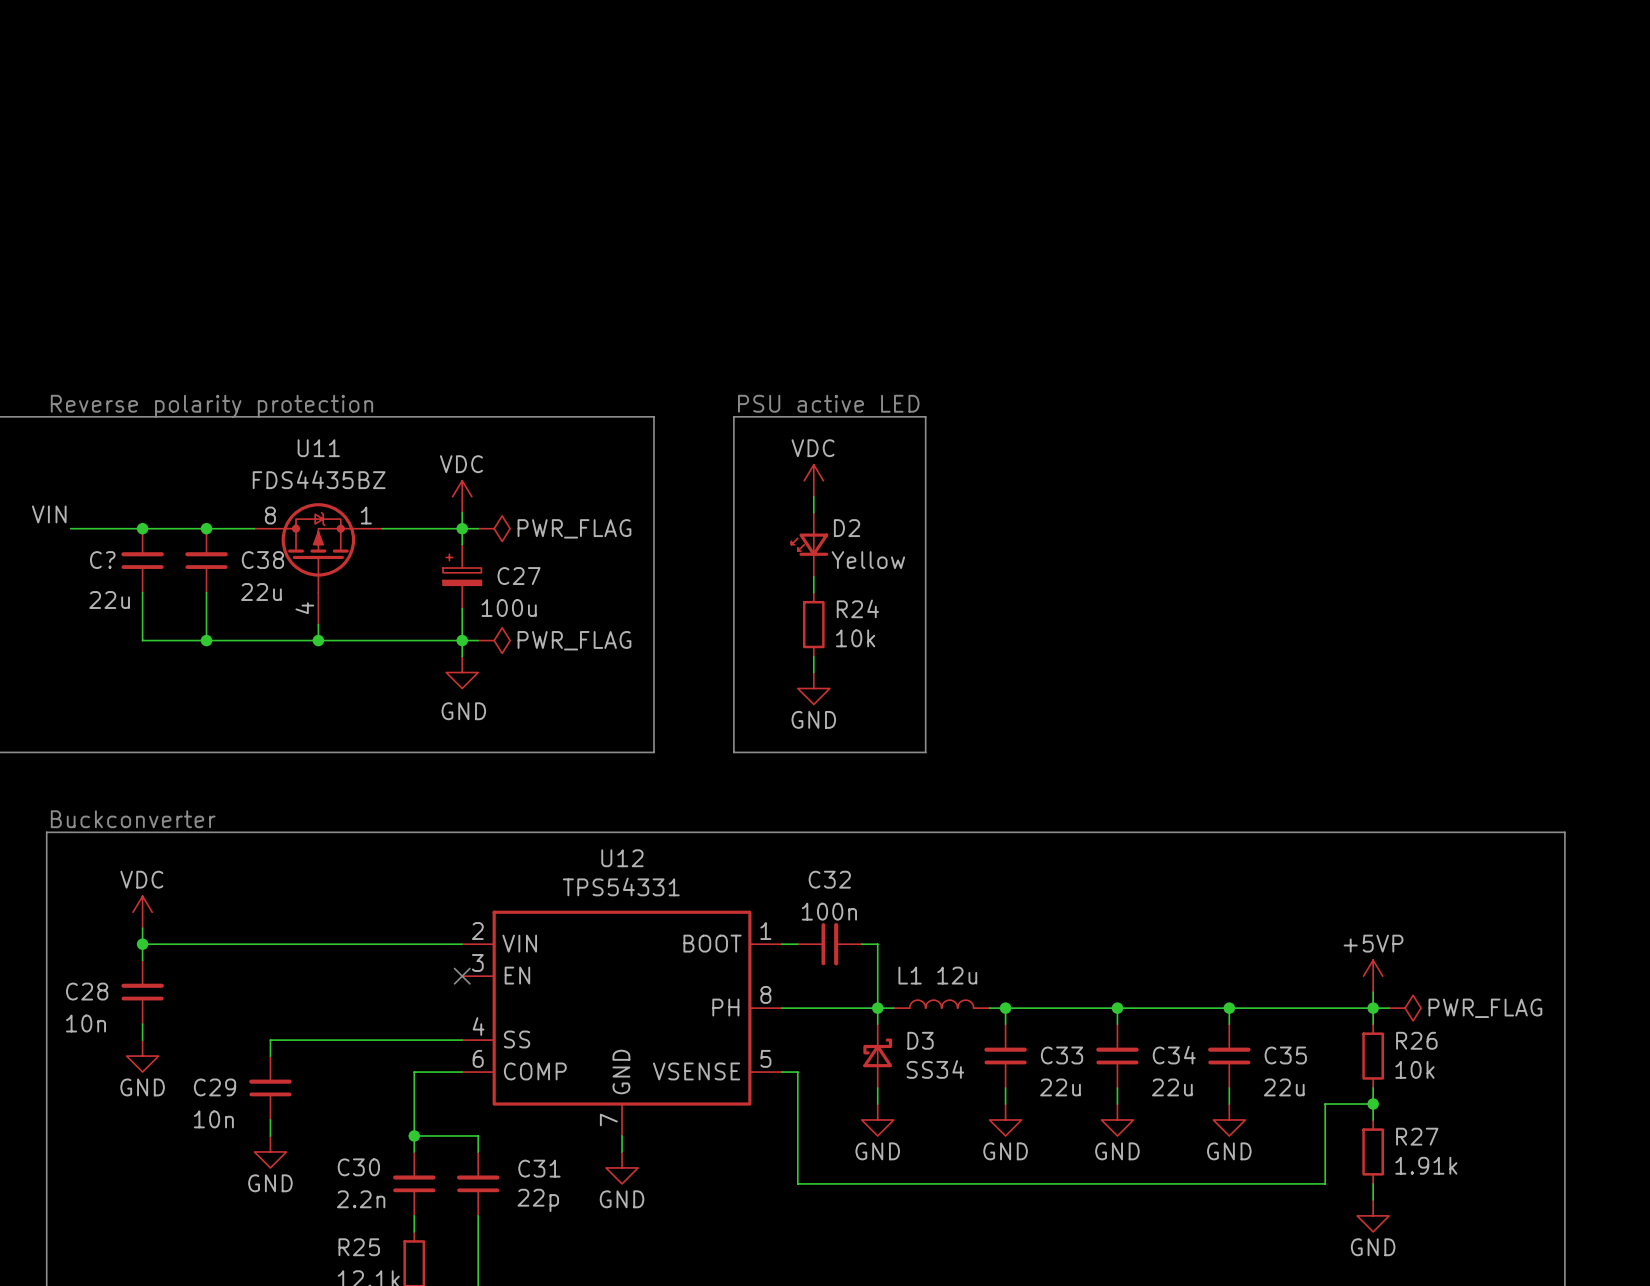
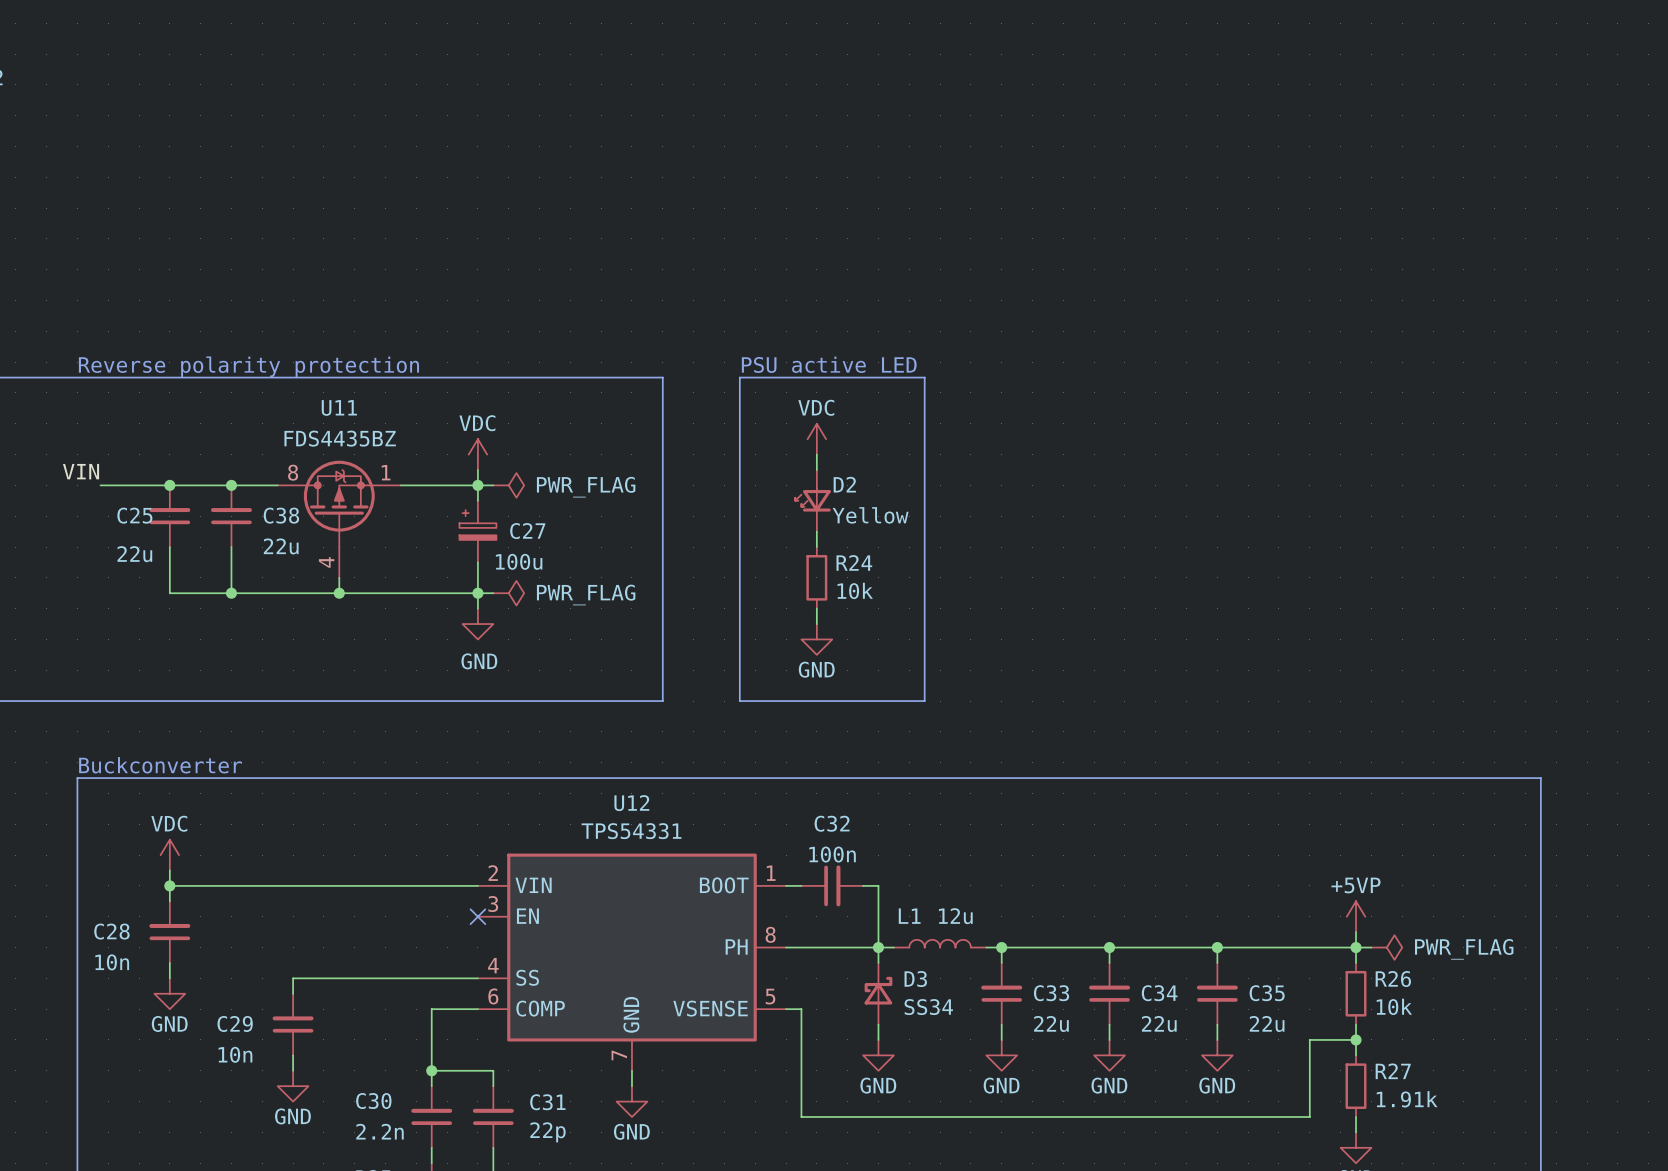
C? name: C? (102, 560) -> C25 (134, 515)

